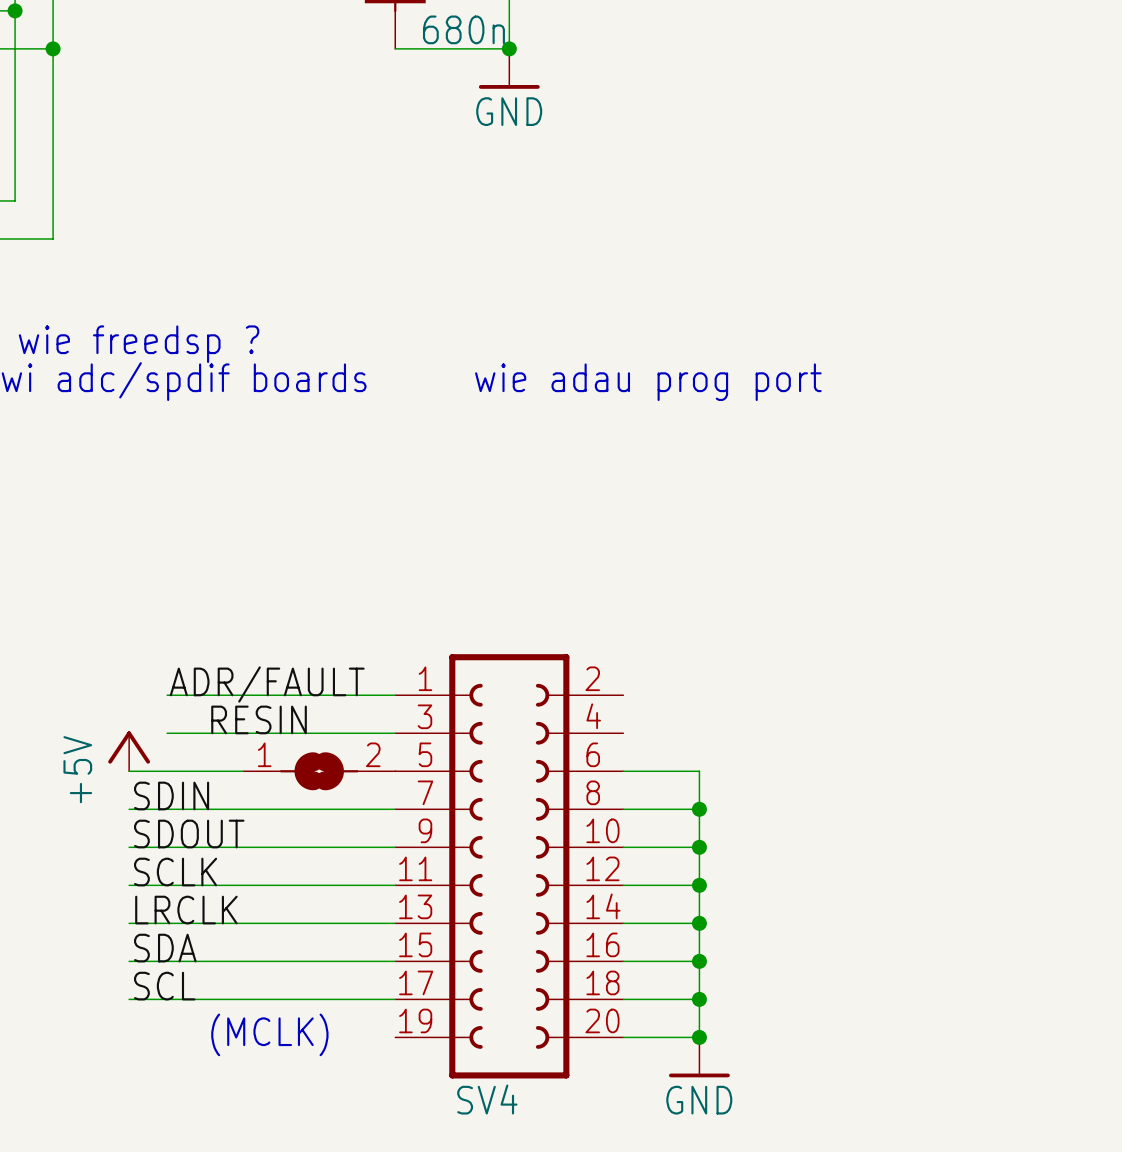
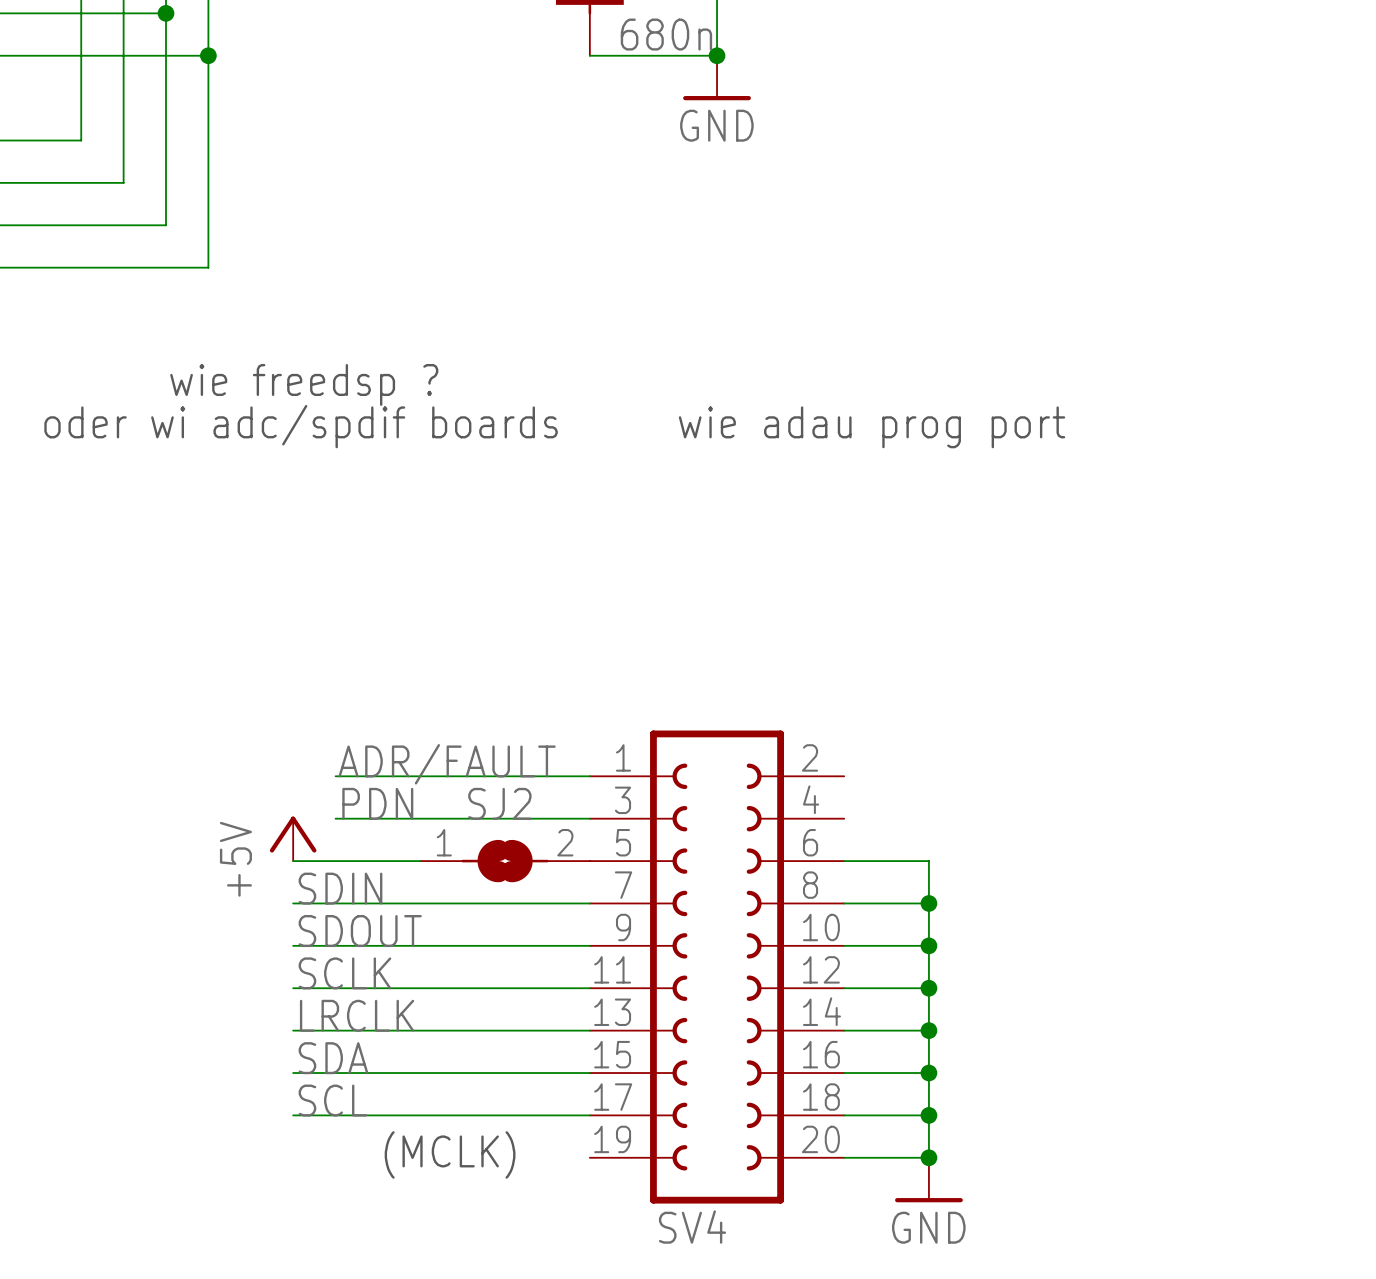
label: none -> PDN (377, 803)
label: RESIN (259, 719) -> none
SJ2 name: none -> SJ2 (499, 803)

